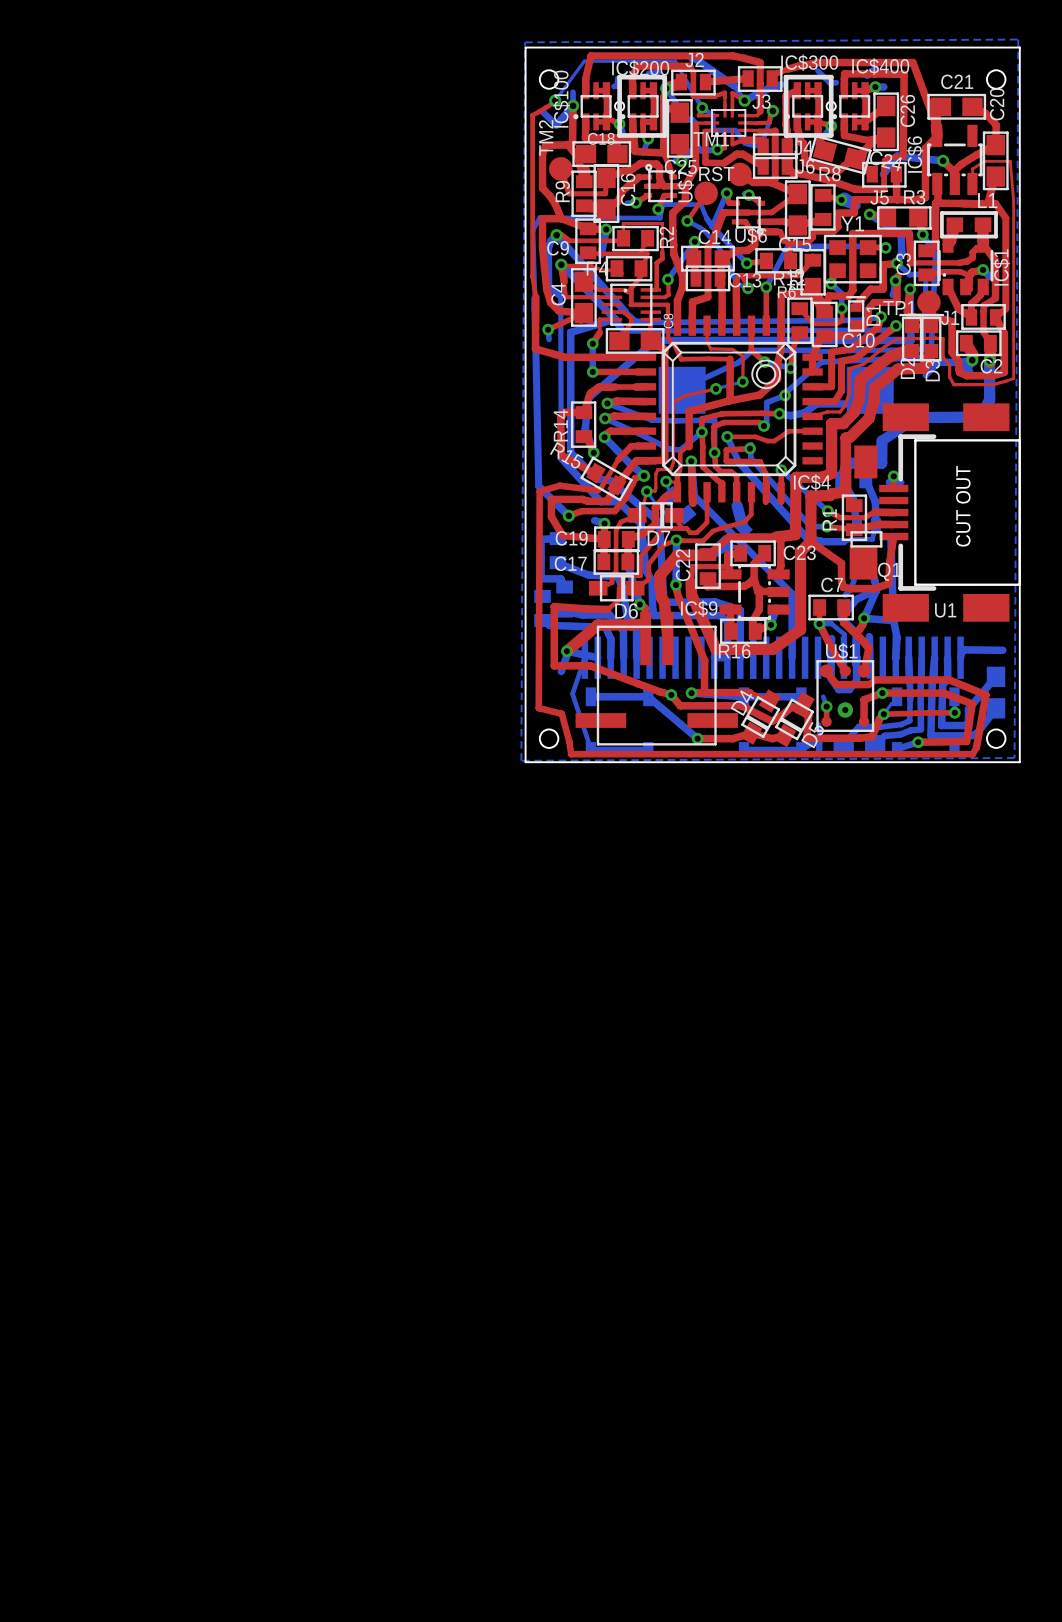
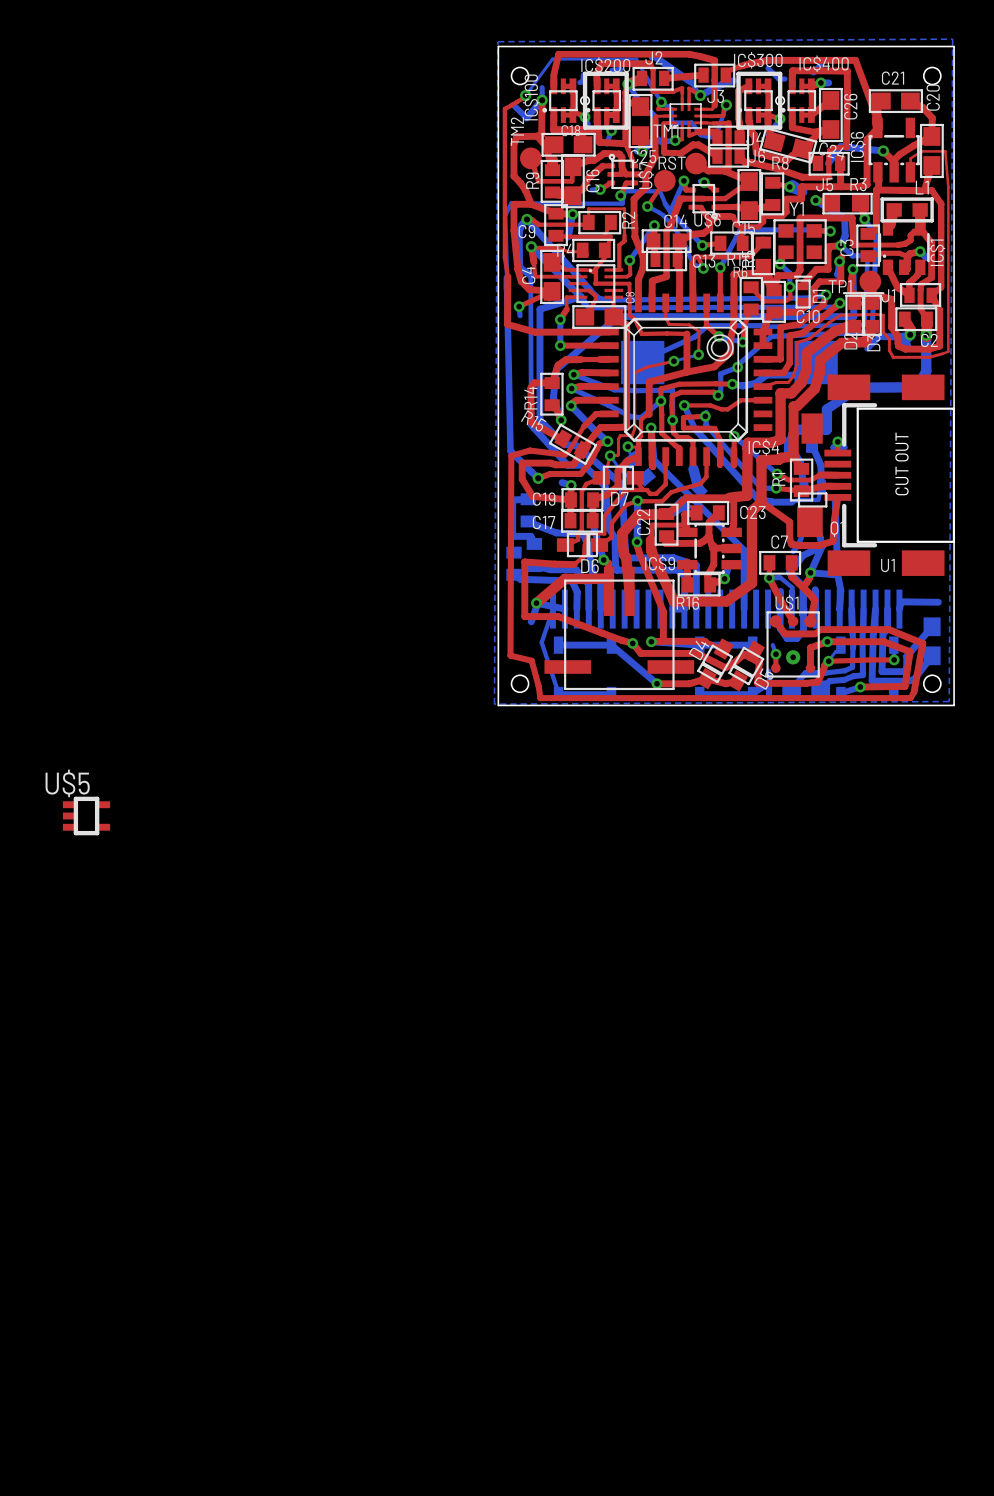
U$5: none -> (86, 816)

